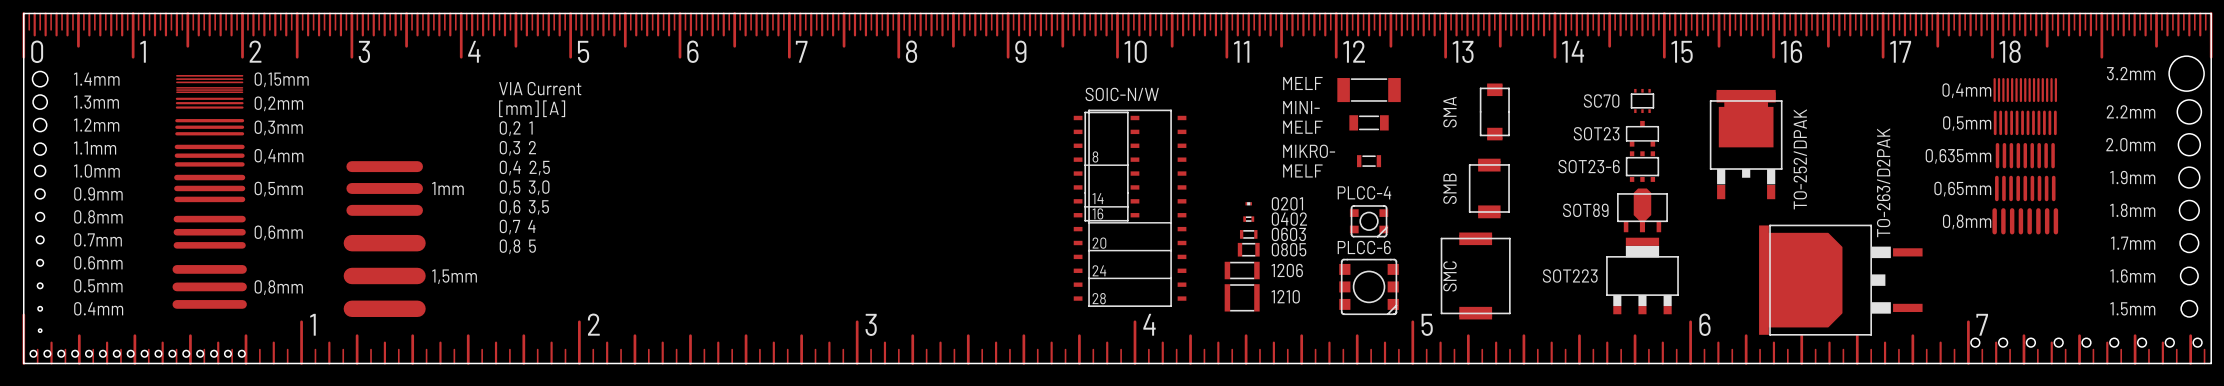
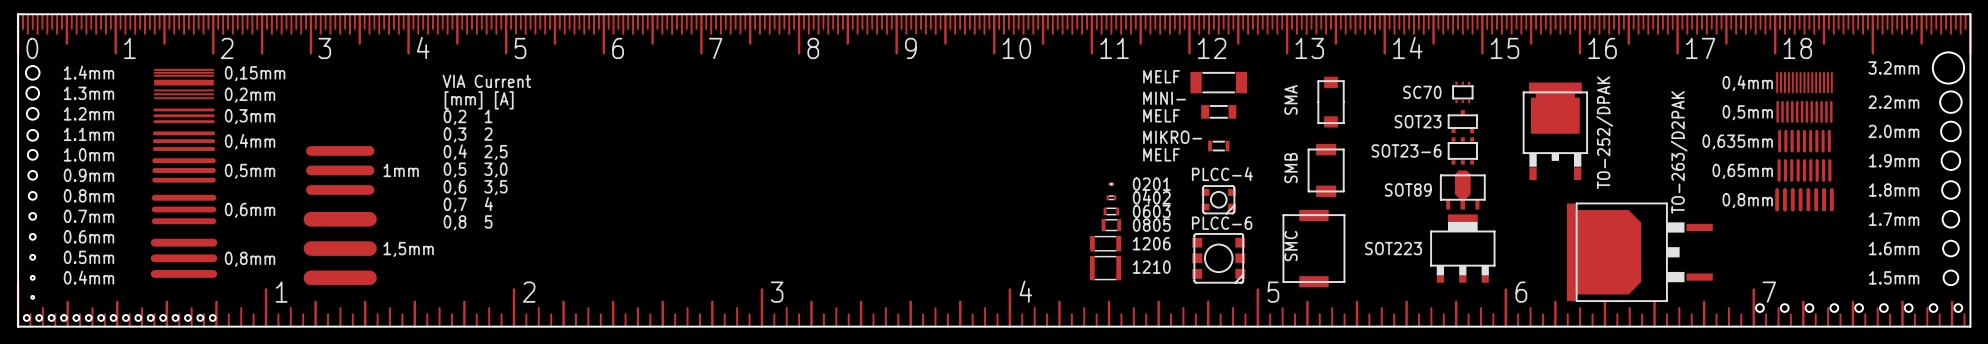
text: SOIC-N/W (1122, 94) -> none
part: (1130, 208) -> none

